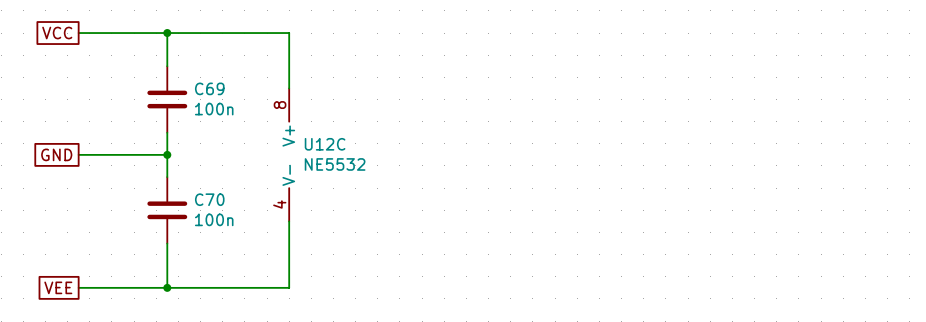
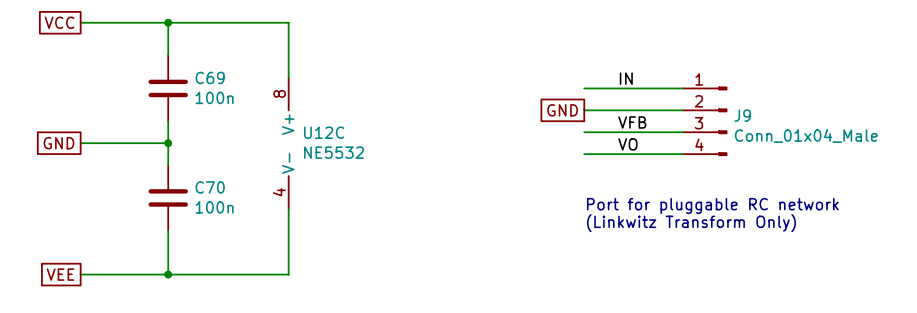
label: none -> IN (626, 78)
wire: none -> (584, 88) (682, 88)
global label: none -> GND (562, 110)
wire: none -> (584, 110) (682, 110)
J9: none -> Conn_01x04_Male (705, 121)
label: none -> VFB (632, 122)
wire: none -> (584, 132) (682, 132)
label: none -> VO (627, 144)
wire: none -> (584, 154) (682, 154)
text: none -> Port for pluggable RC network (712, 206)
text: none -> (Linkwitz Transform Only) (691, 223)

